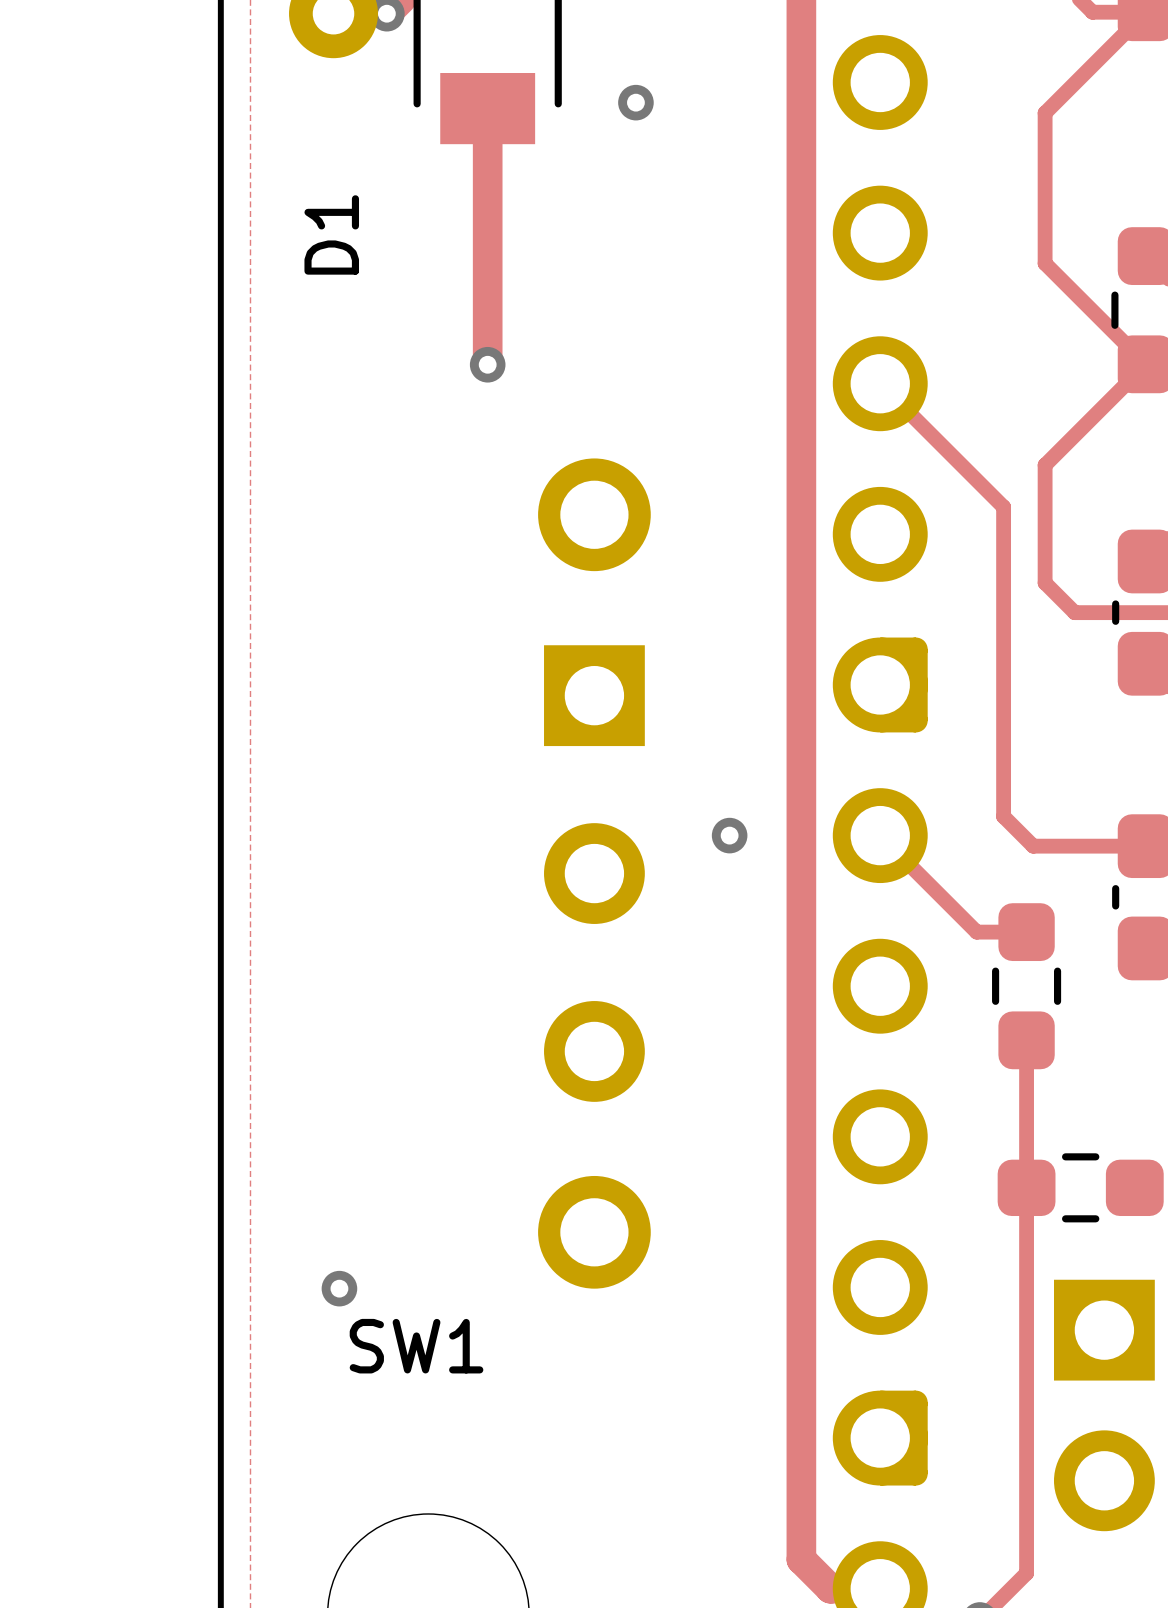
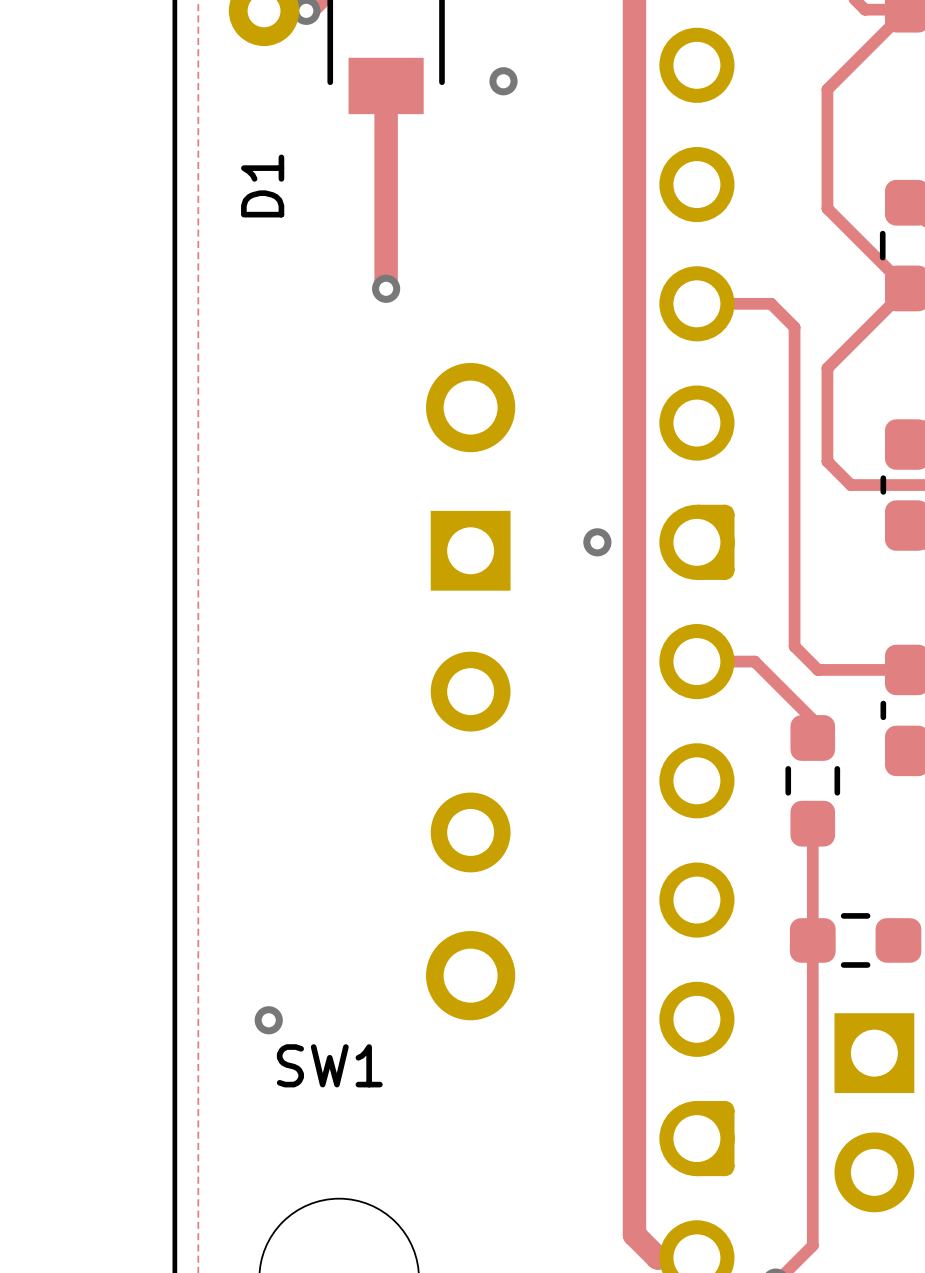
track: (880, 383) (1003, 507) -> (696, 303) (771, 303) (794, 327) (794, 401)
via position: (729, 835) -> (597, 542)
track: (880, 835) (976, 932) (1026, 932) -> (696, 661) (754, 661) (812, 719) (812, 737)

